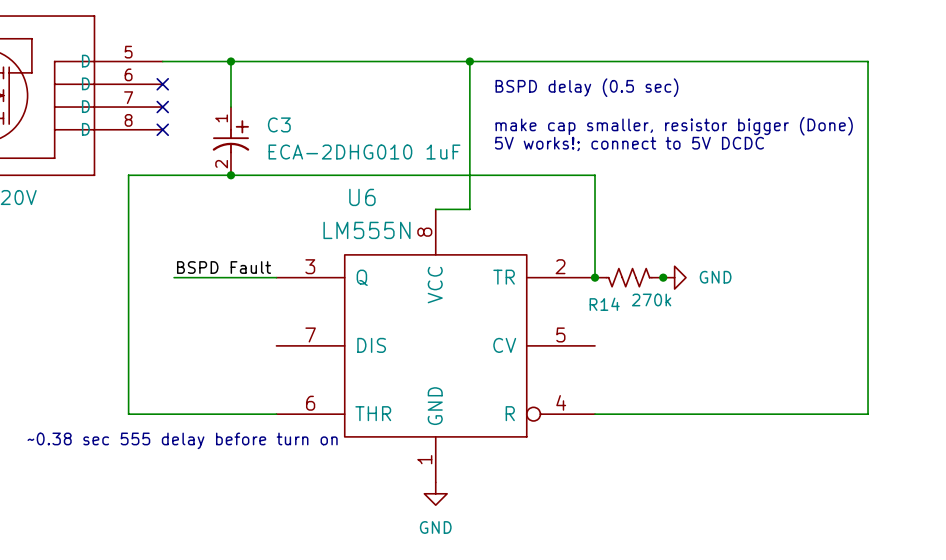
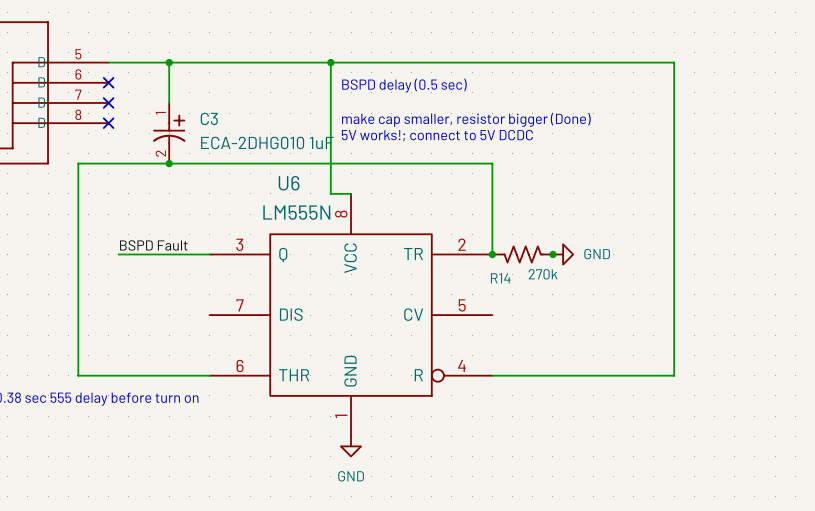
junction: none -> (330, 62)
wire: (469, 61) (469, 209) (435, 209) -> (330, 62) (330, 193) (351, 193)
junction: (469, 61) -> none
wire: (799, 61) (868, 61) (868, 414) (799, 414) -> (674, 62) (674, 375)
text position: BSPD delay (0.5 sec) (586, 87) -> BSPD delay (0.5 sec) (404, 85)
text position: make cap smaller, resistor bigger (Done) (674, 126) -> make cap smaller, resistor bigger (Done) (466, 119)
text position: 5V works!; connect to 5V DCDC (629, 144) -> 5V works!; connect to 5V DCDC (437, 135)

